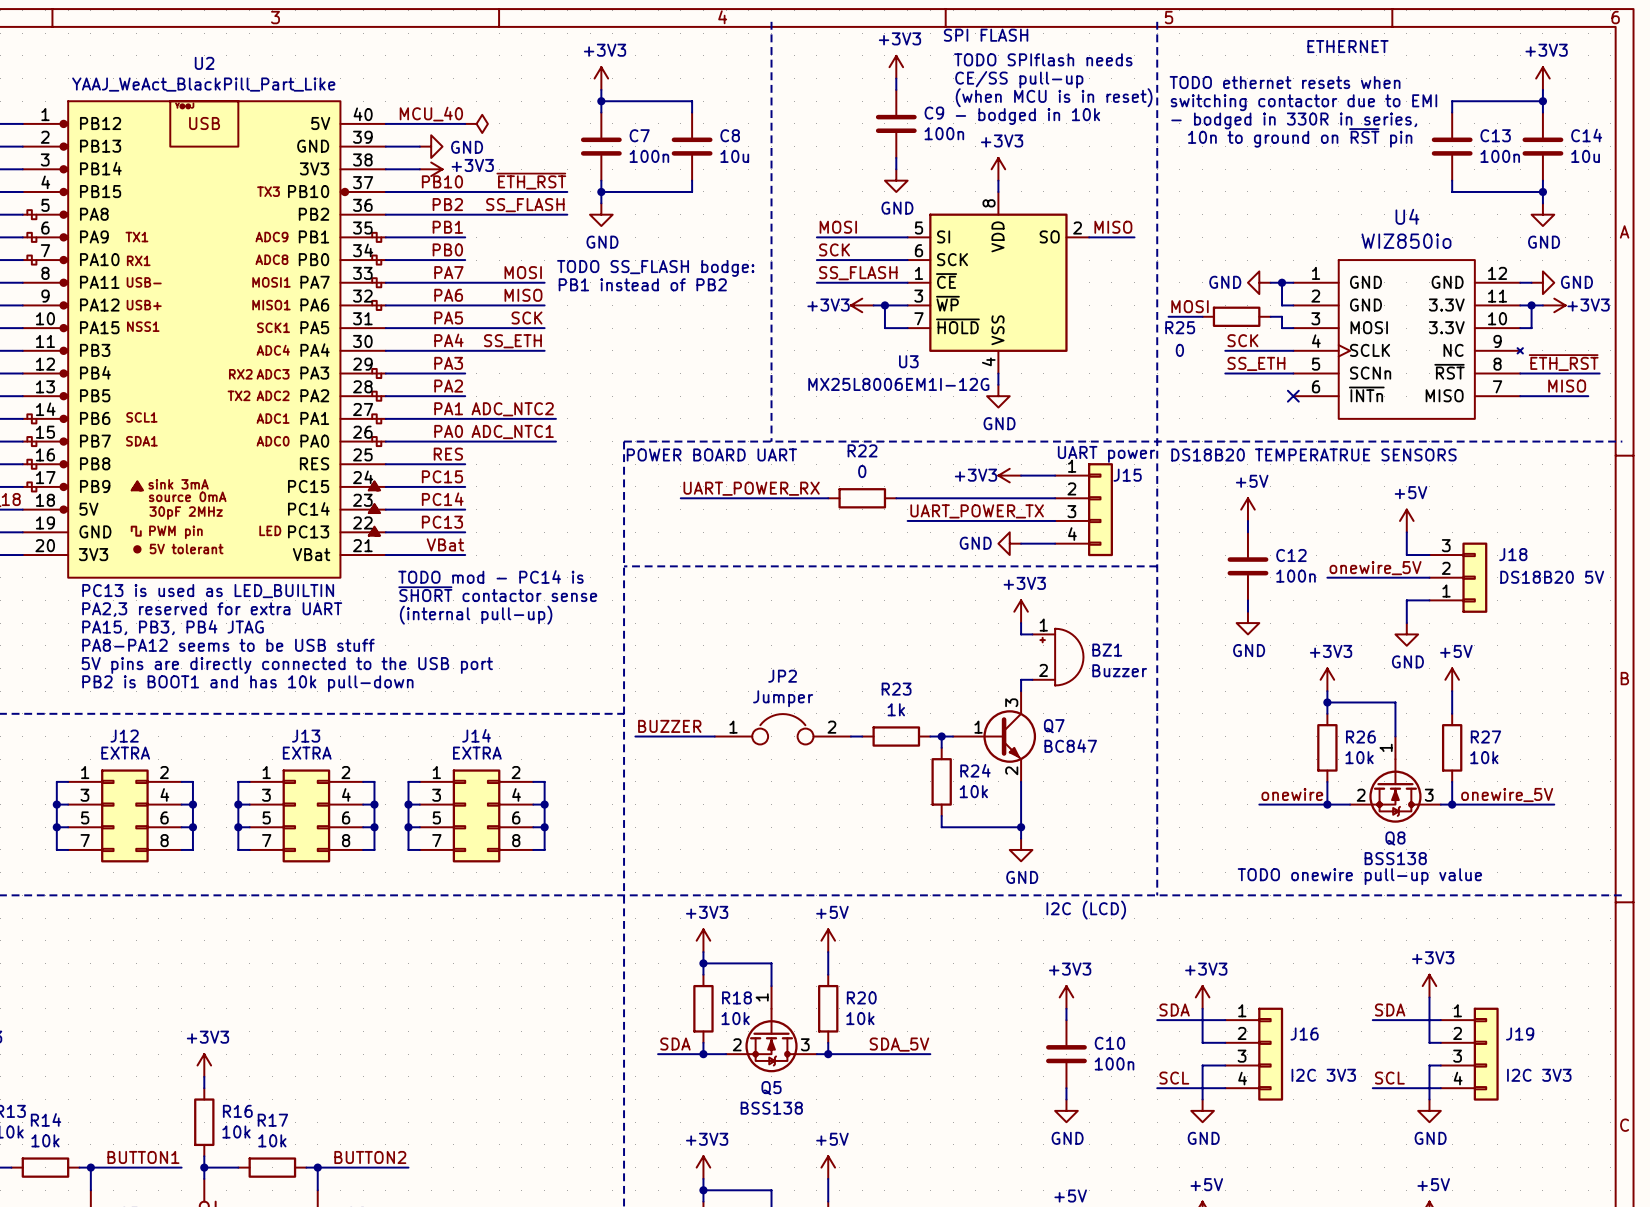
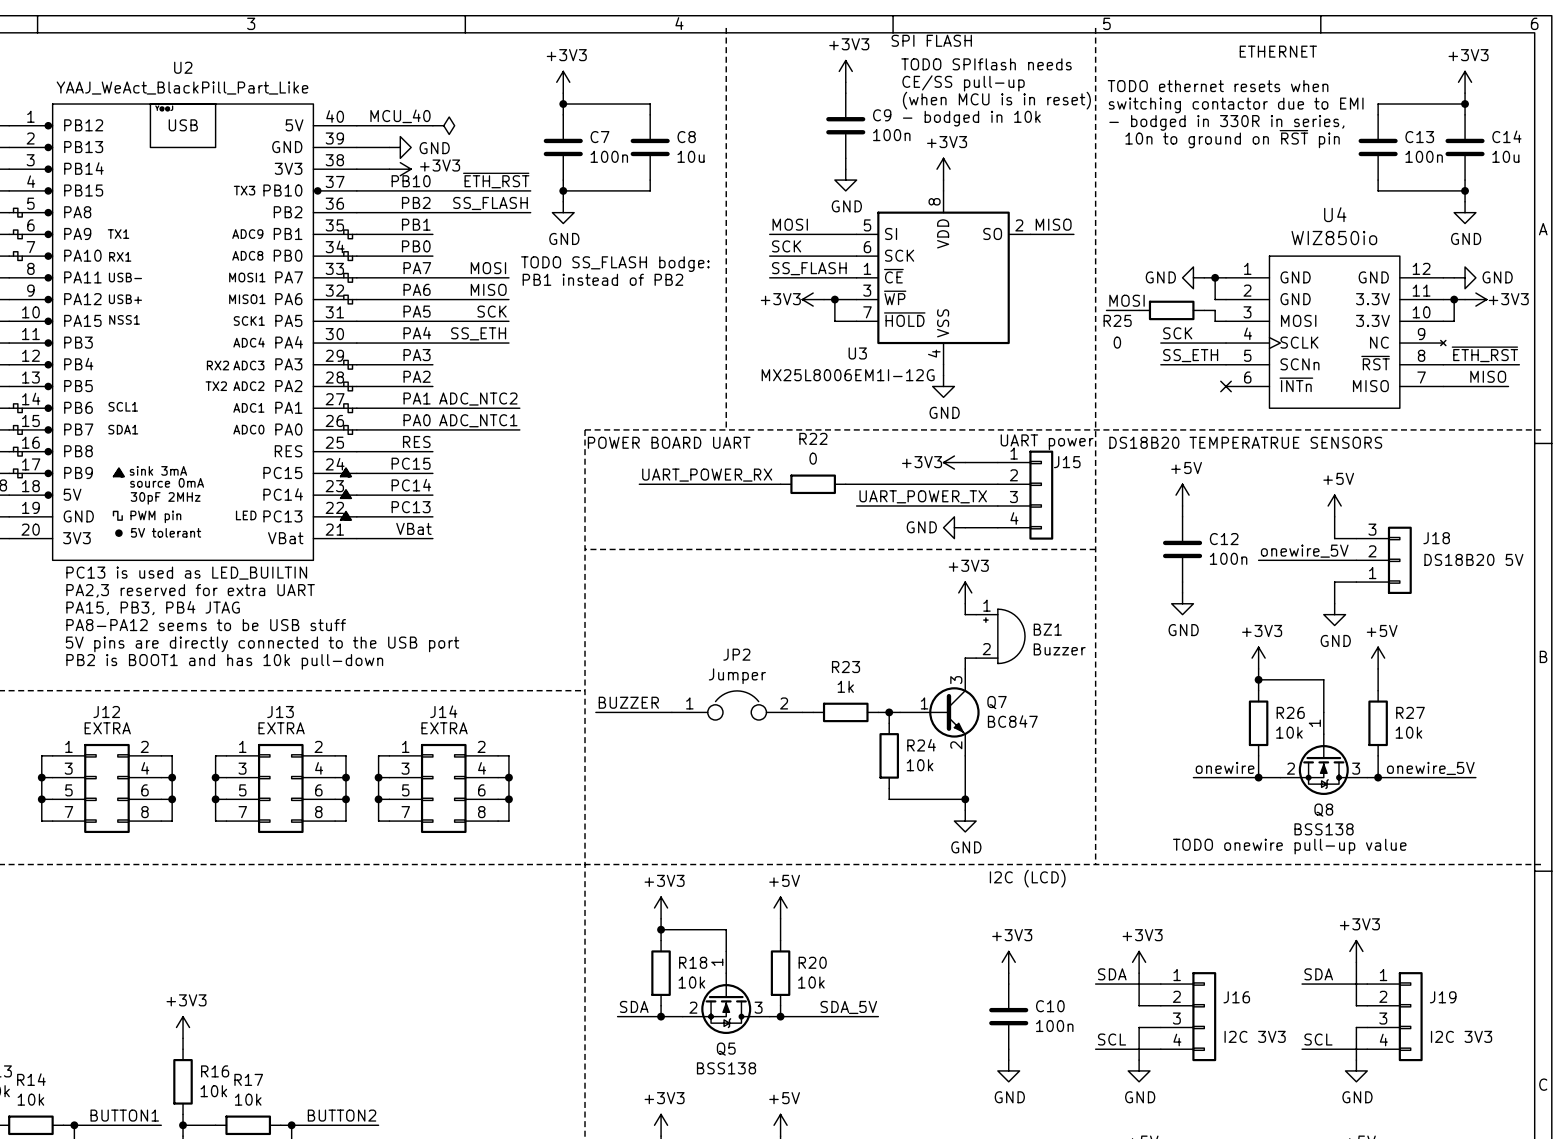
text: TODO mod - PC14 is (490, 576) -> none
text: ~{SHORT} contactor sense (497, 594) -> none
text: (internal pull-up) (476, 615) -> none

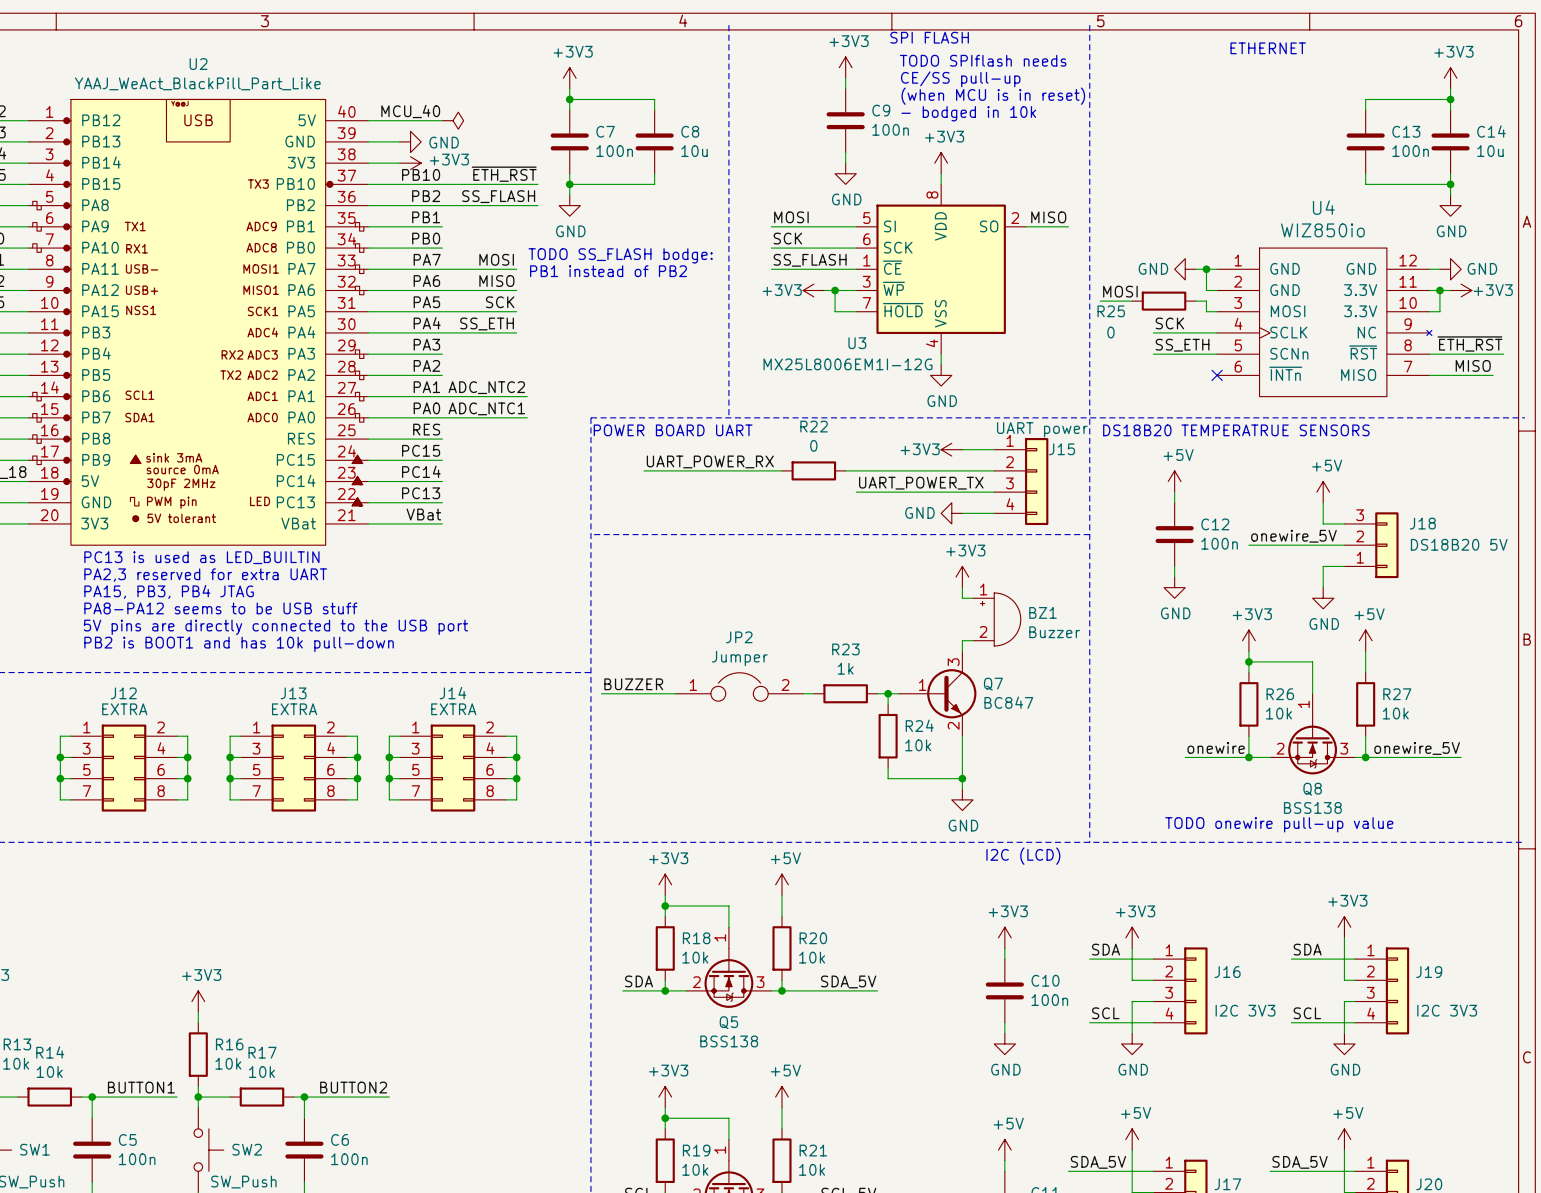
text: TODO ethernet resets when (1218, 86) -> none
text: switching contactor due to EMI (1236, 105) -> none
text: - bodged in 330R in series, (1226, 122) -> none
text: 10n to ground on ~{RST} pin (1232, 139) -> none

